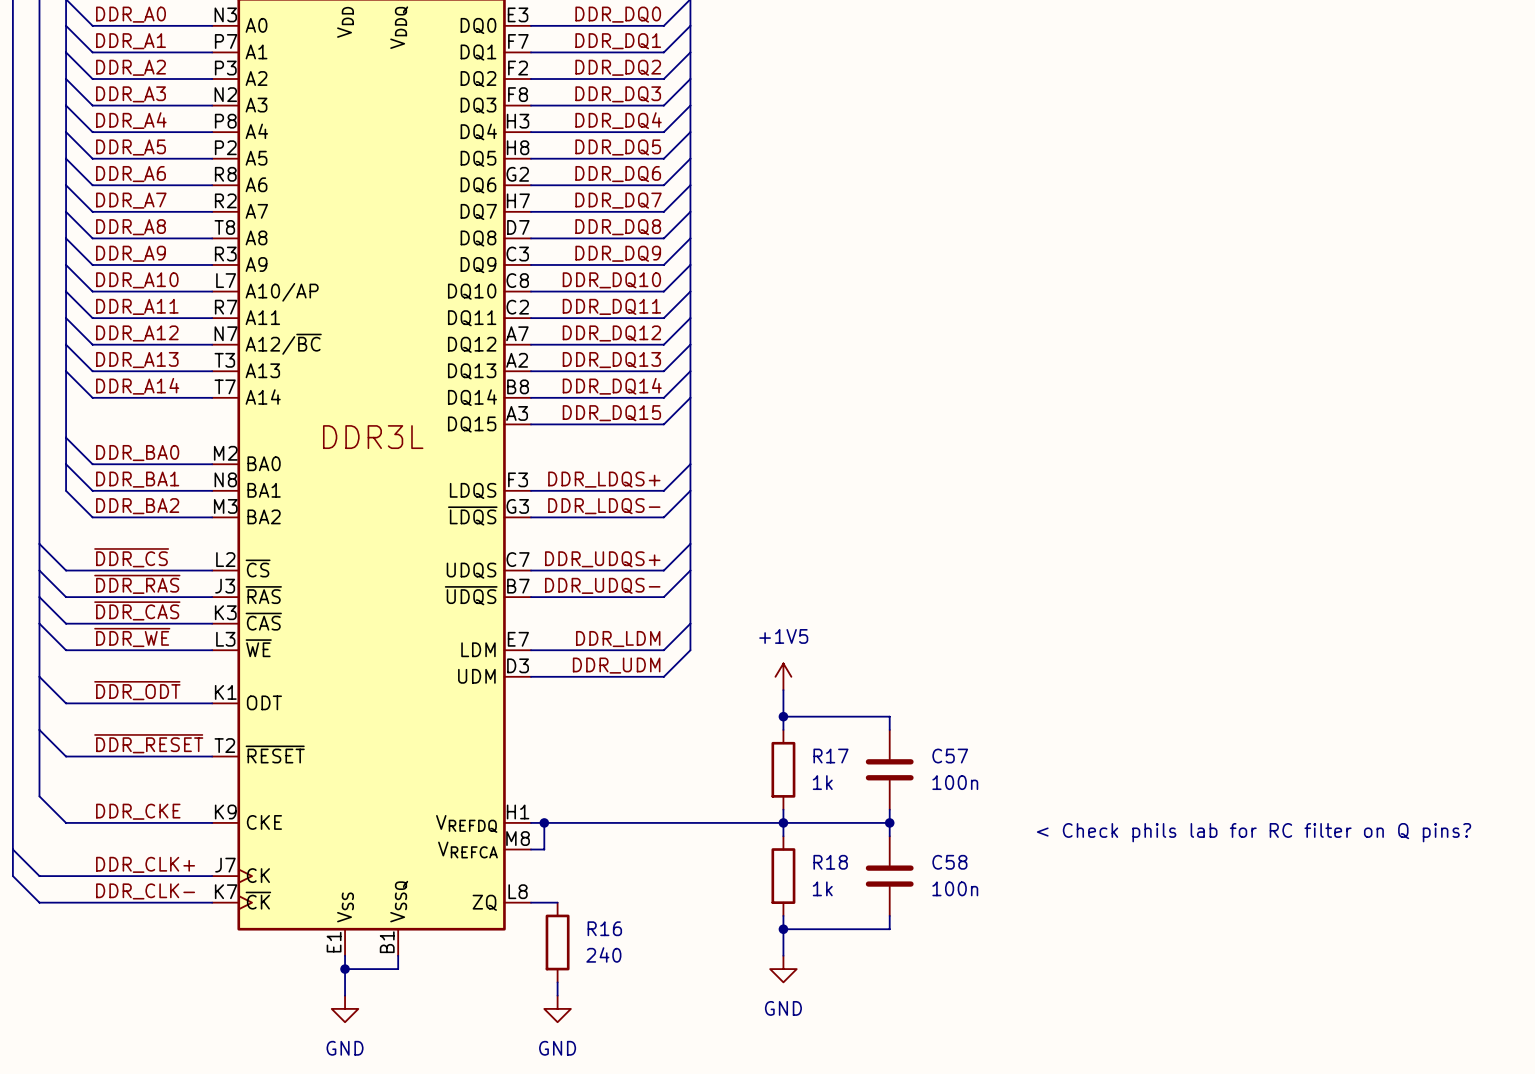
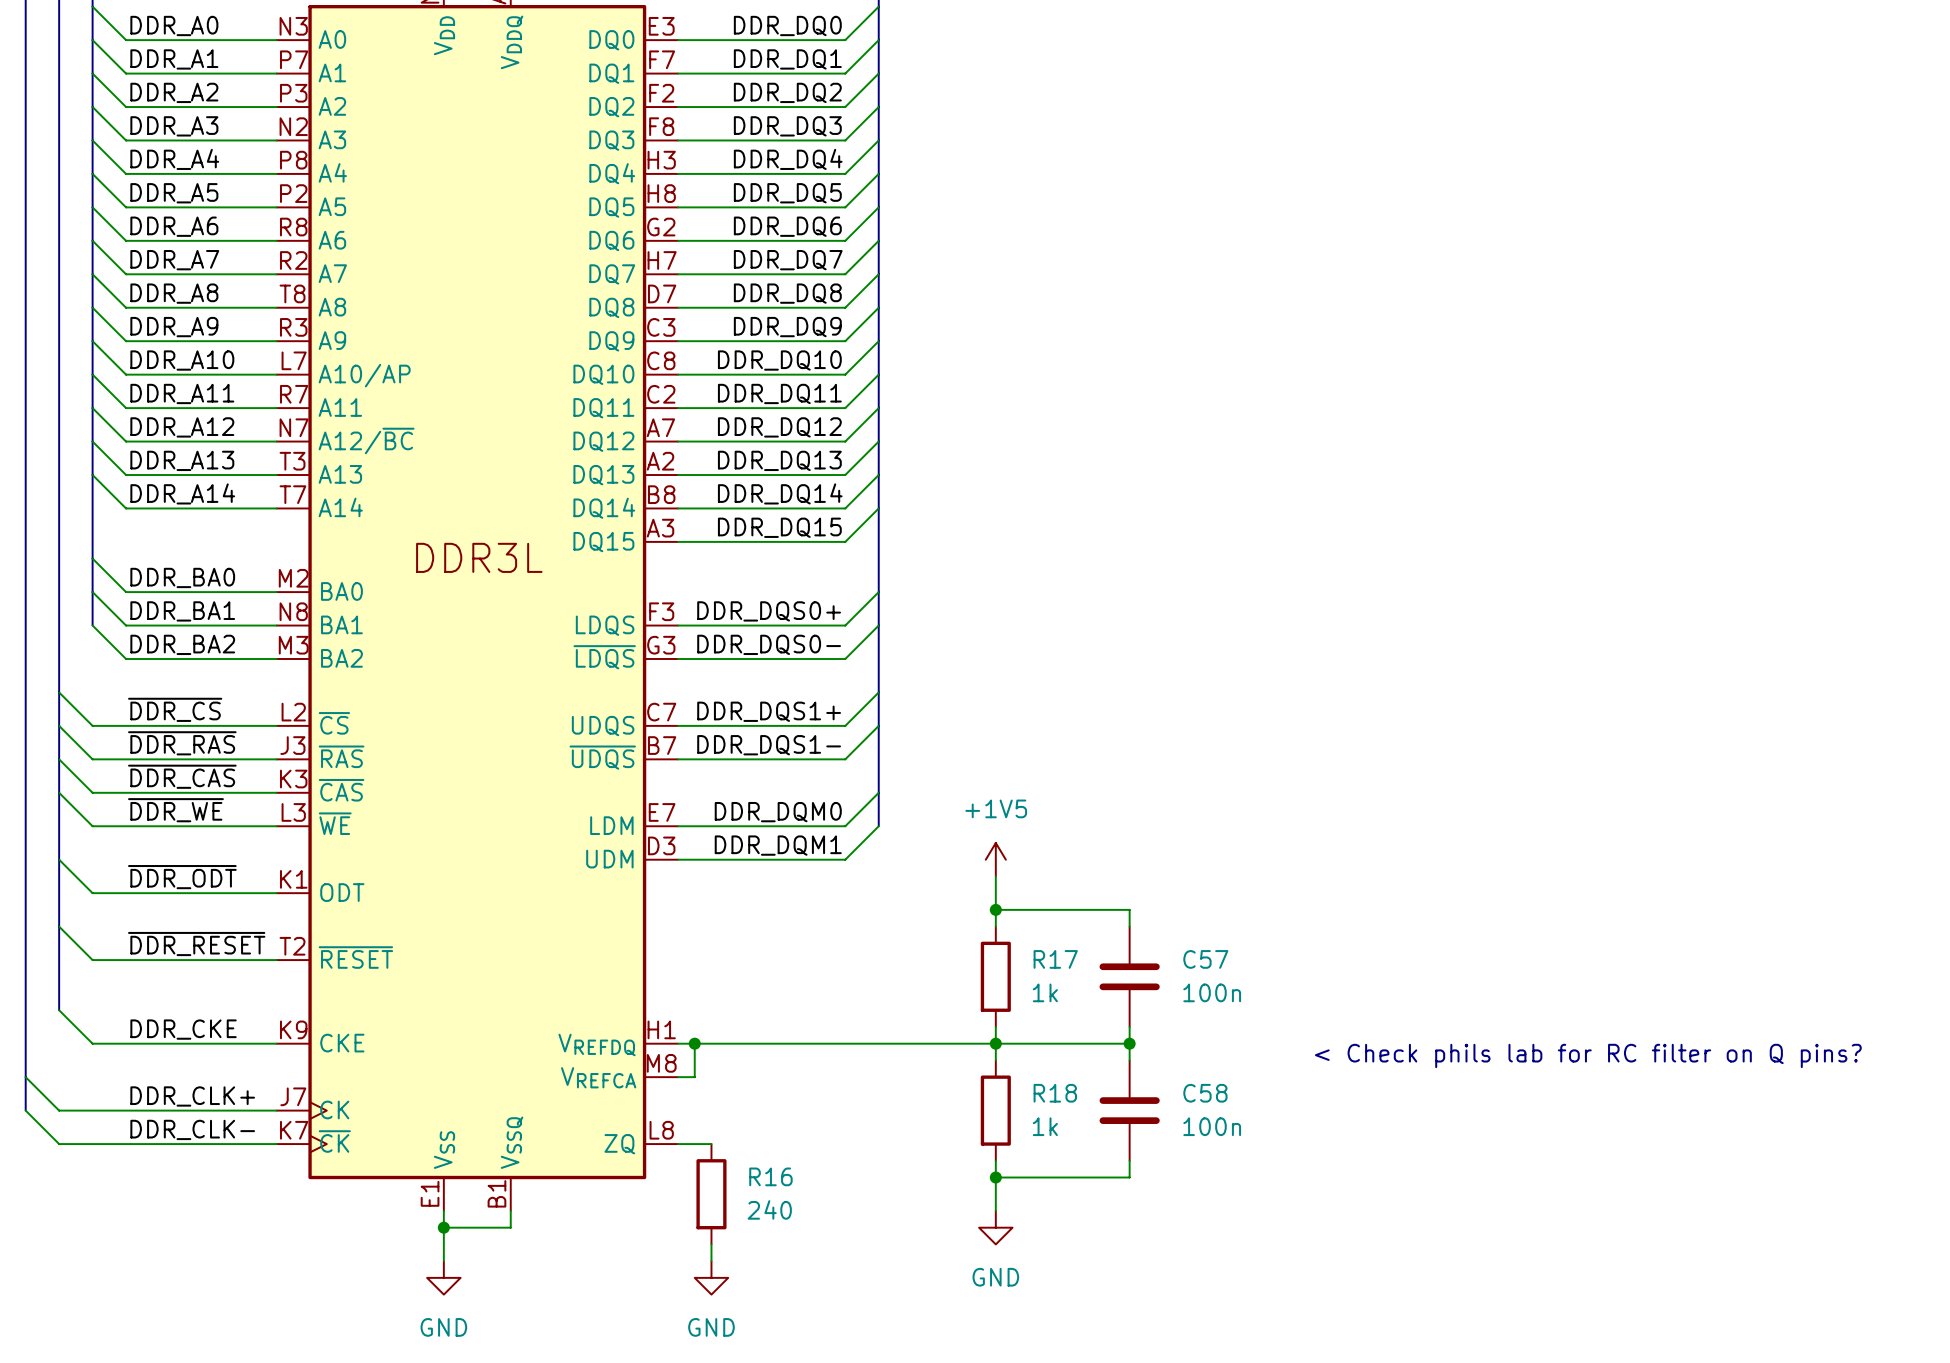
label: DDR_LDQS+ (604, 479) -> DDR_DQS0+ (769, 611)
label: DDR_LDQS- (604, 506) -> DDR_DQS0- (769, 644)
label: DDR_UDQS+ (602, 559) -> DDR_DQS1+ (769, 711)
label: DDR_UDQS- (602, 585) -> DDR_DQS1- (769, 745)
label: DDR_LDM (618, 639) -> DDR_DQM0 (778, 812)
label: DDR_UDM (616, 665) -> DDR_DQM1 (778, 845)

